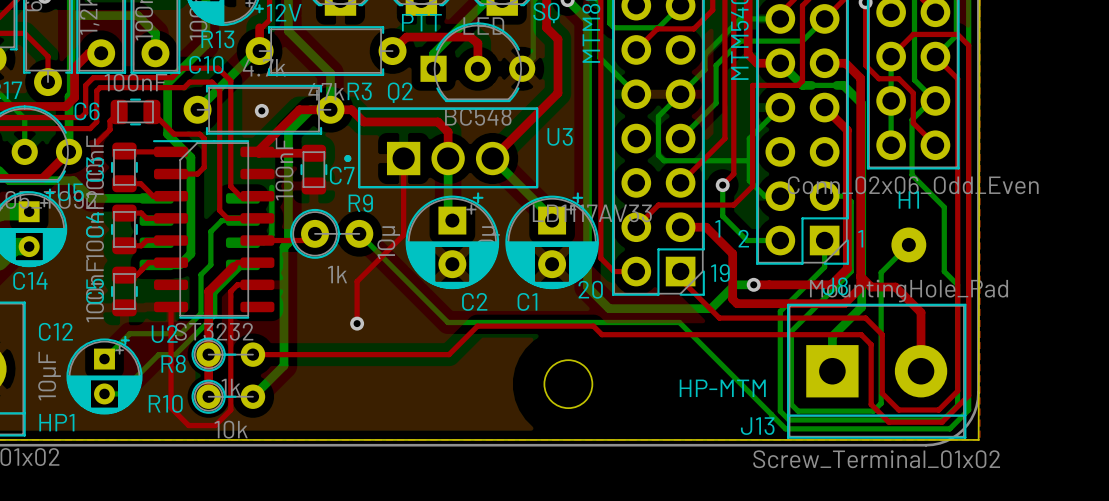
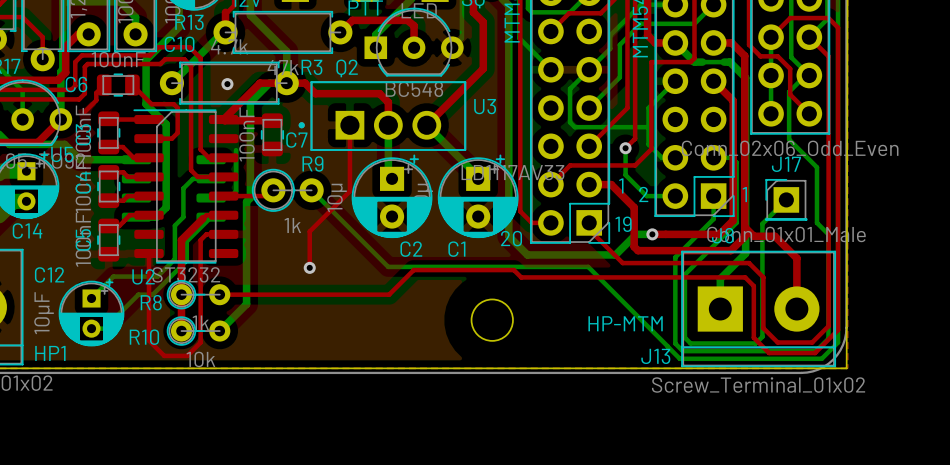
H1: MountingHole_Pad (908, 244) -> none
J17: none -> Conn_01x01_Male (786, 199)

